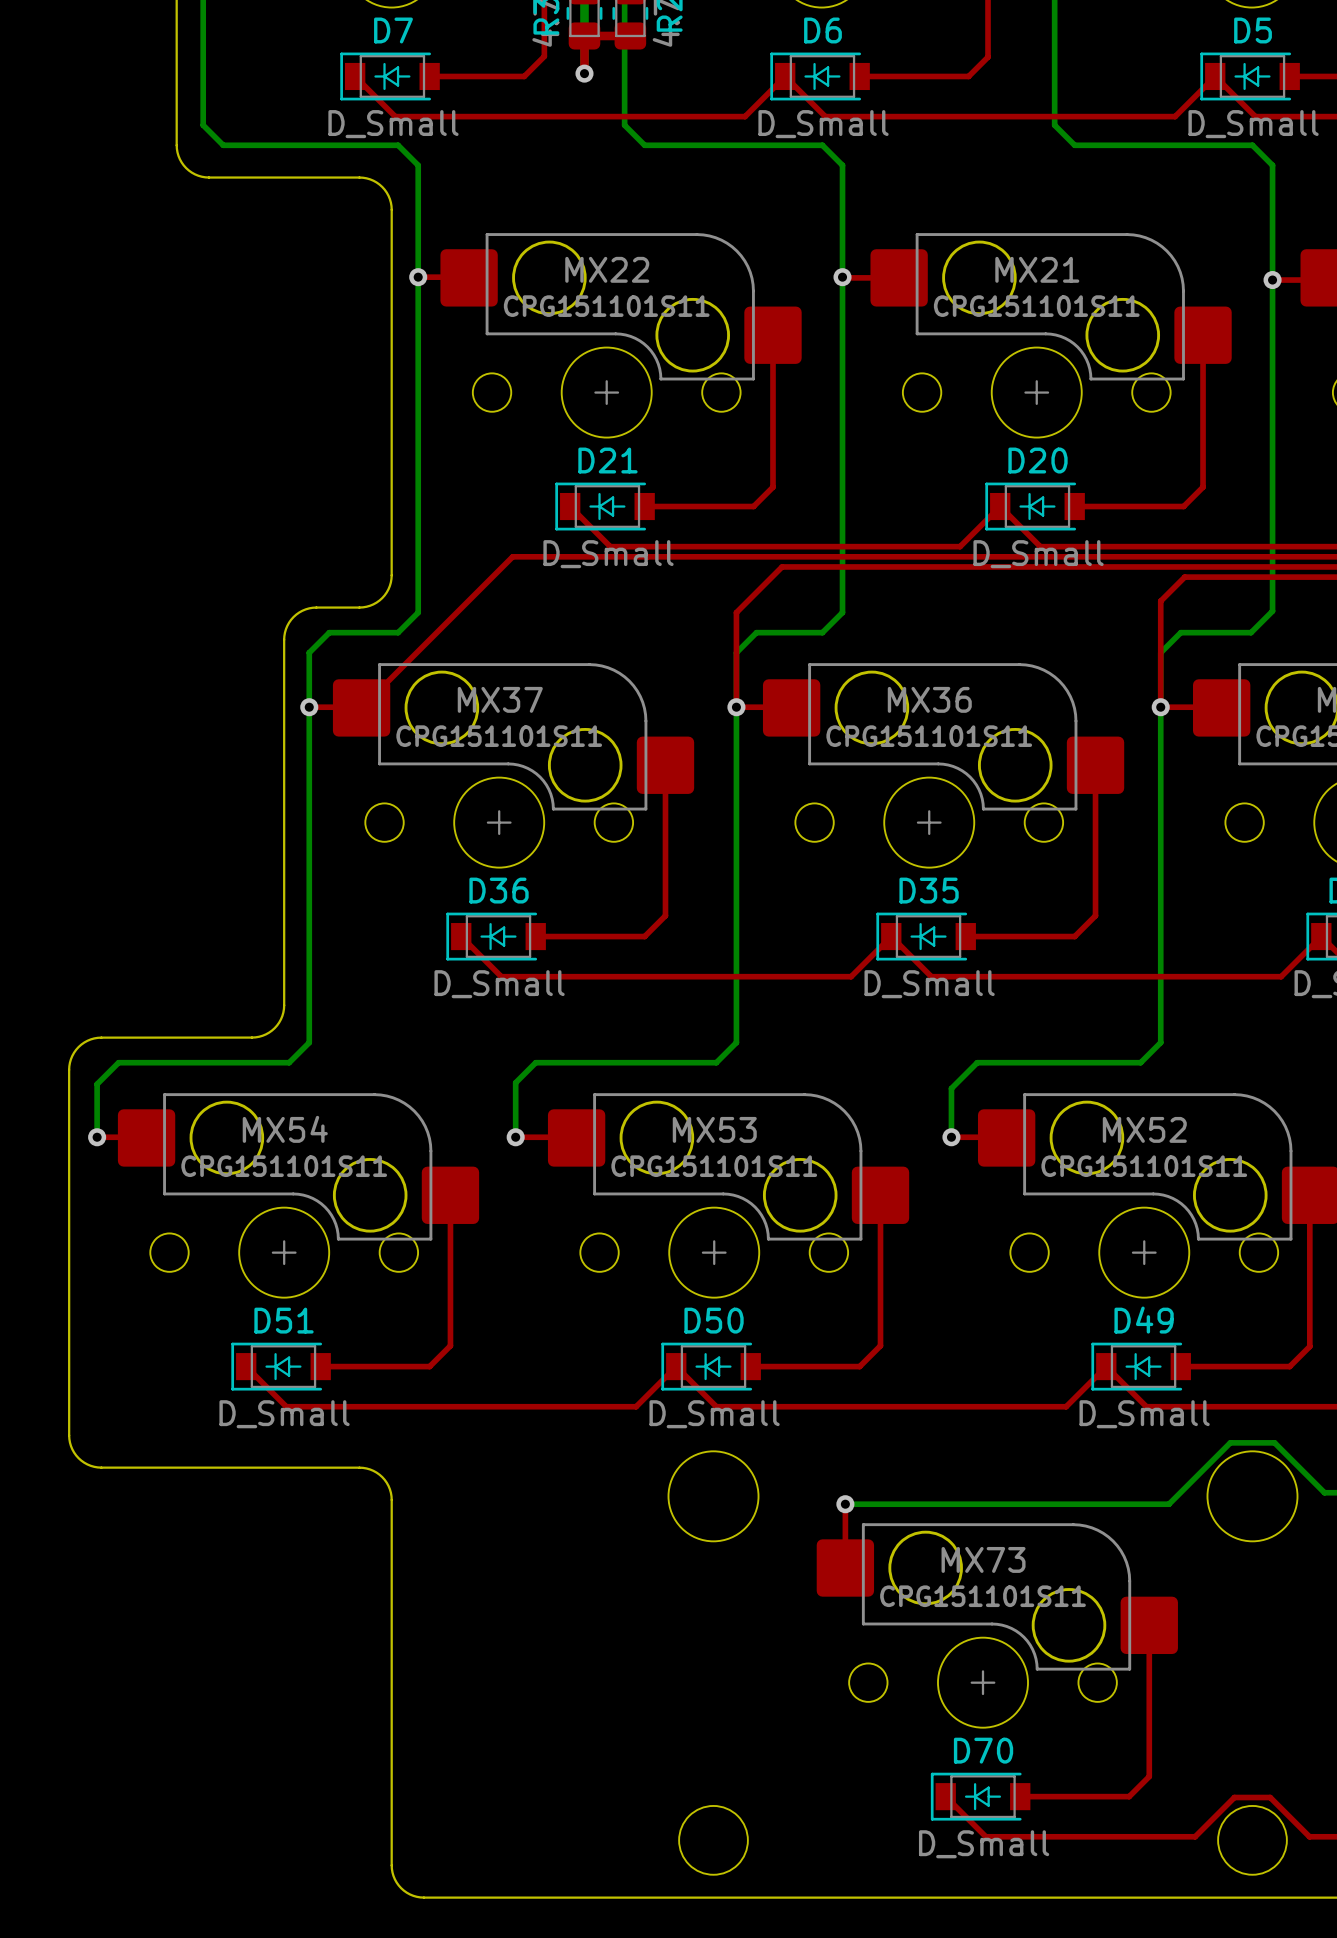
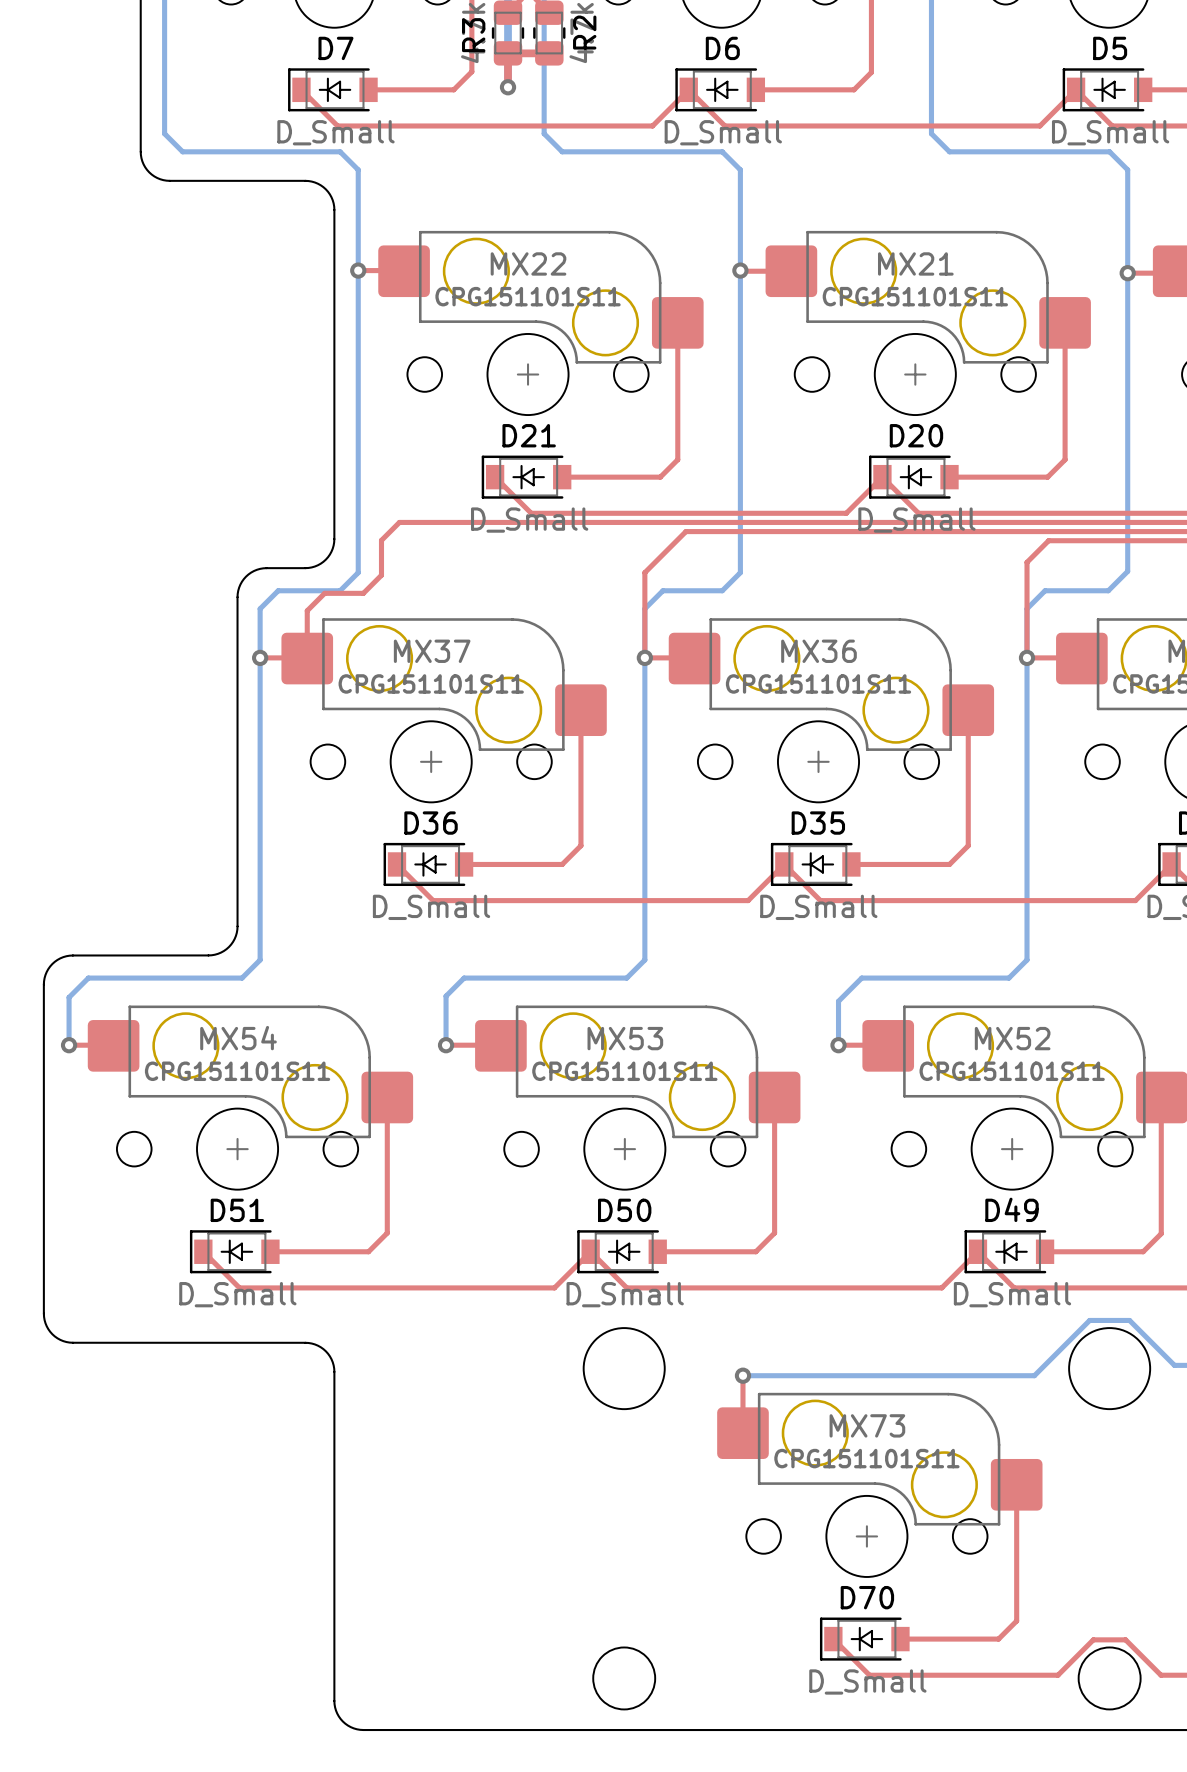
top track: (512, 556) (361, 707) -> (443, 522) (399, 522) (381, 540) (381, 575) (363, 593) (324, 593) (307, 610) (307, 658)

